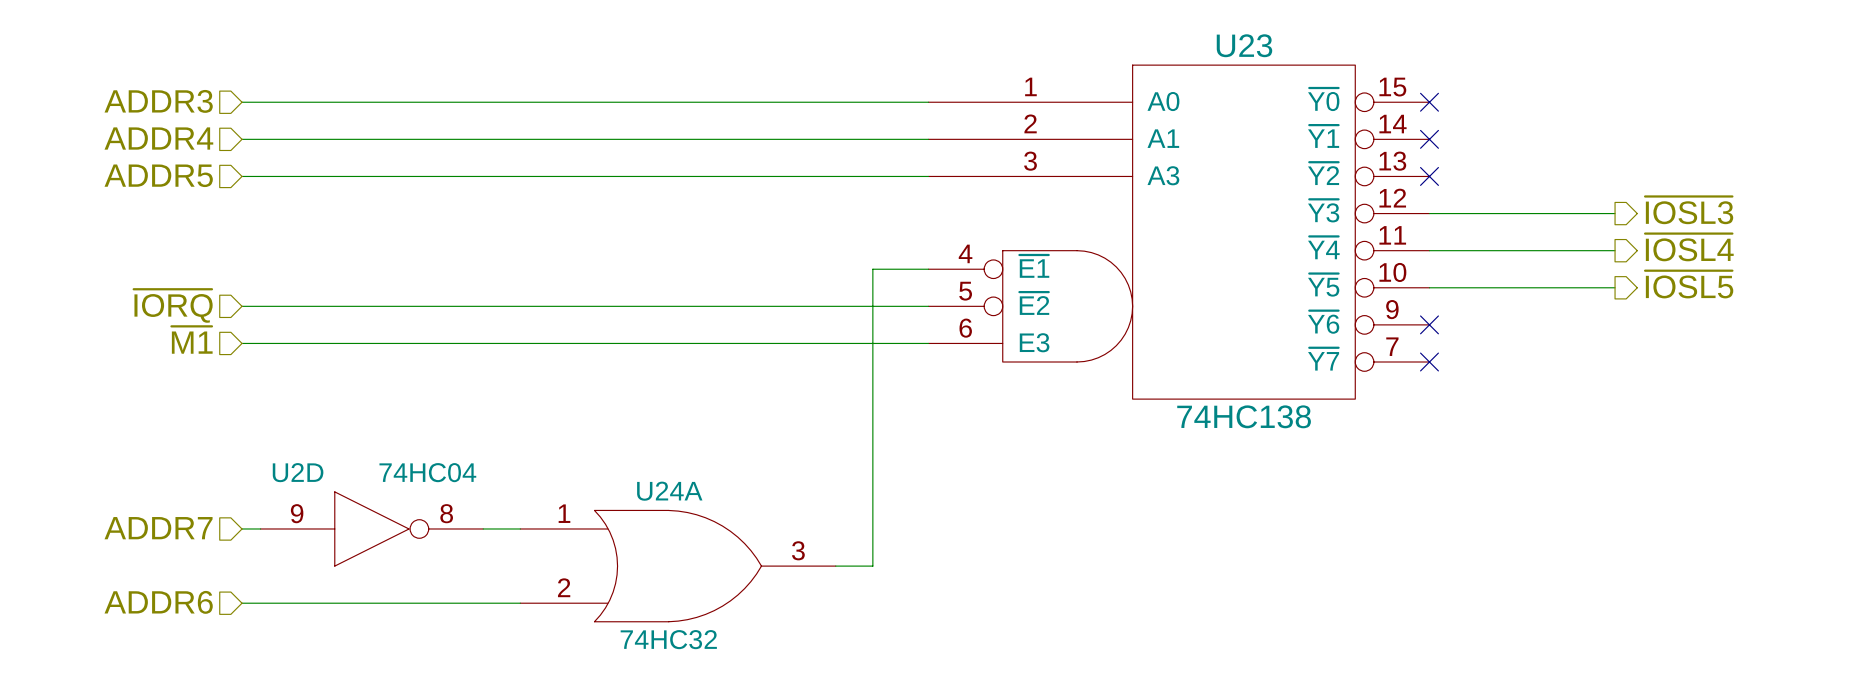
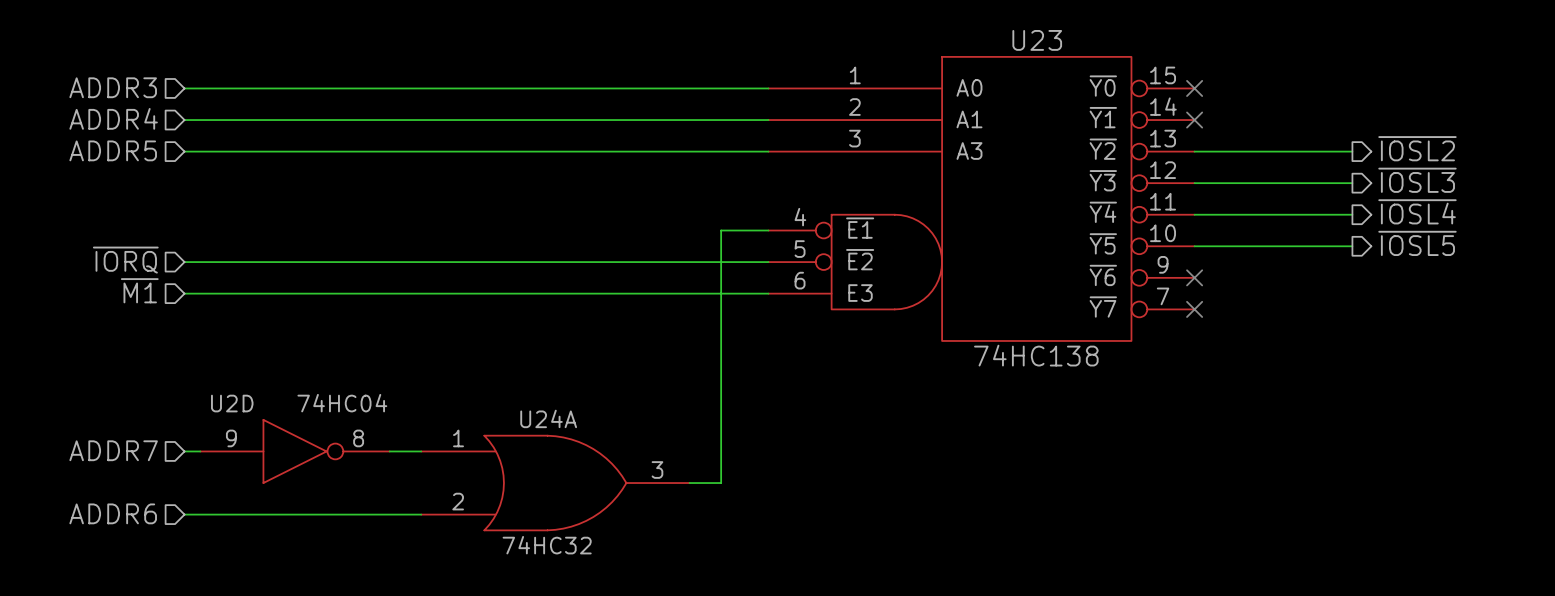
hierarchical label: none -> ~{IOSL2} (1417, 148)
wire: none -> (1194, 151) (1352, 151)
no-connect mark: (1429, 176) -> none

